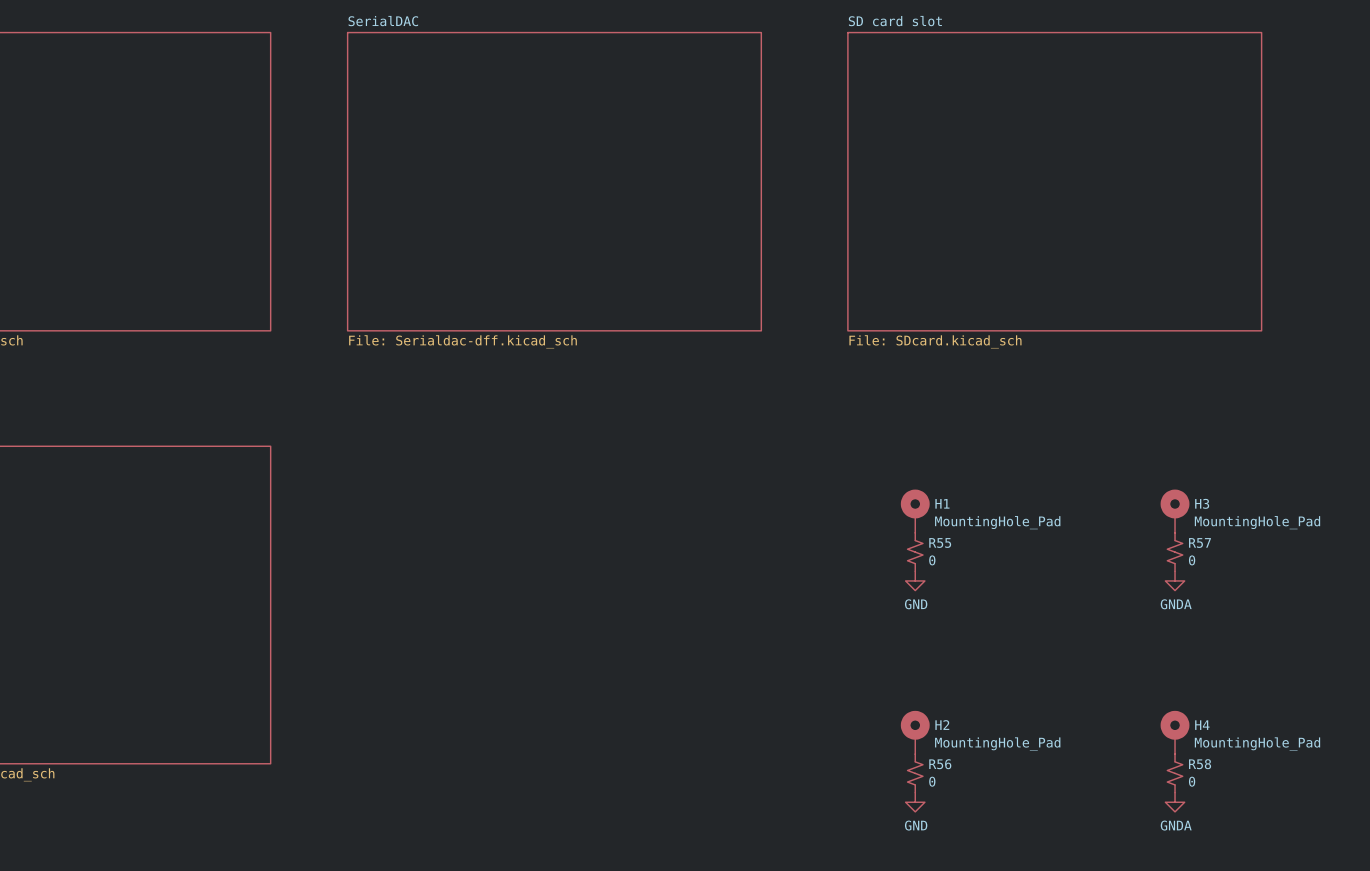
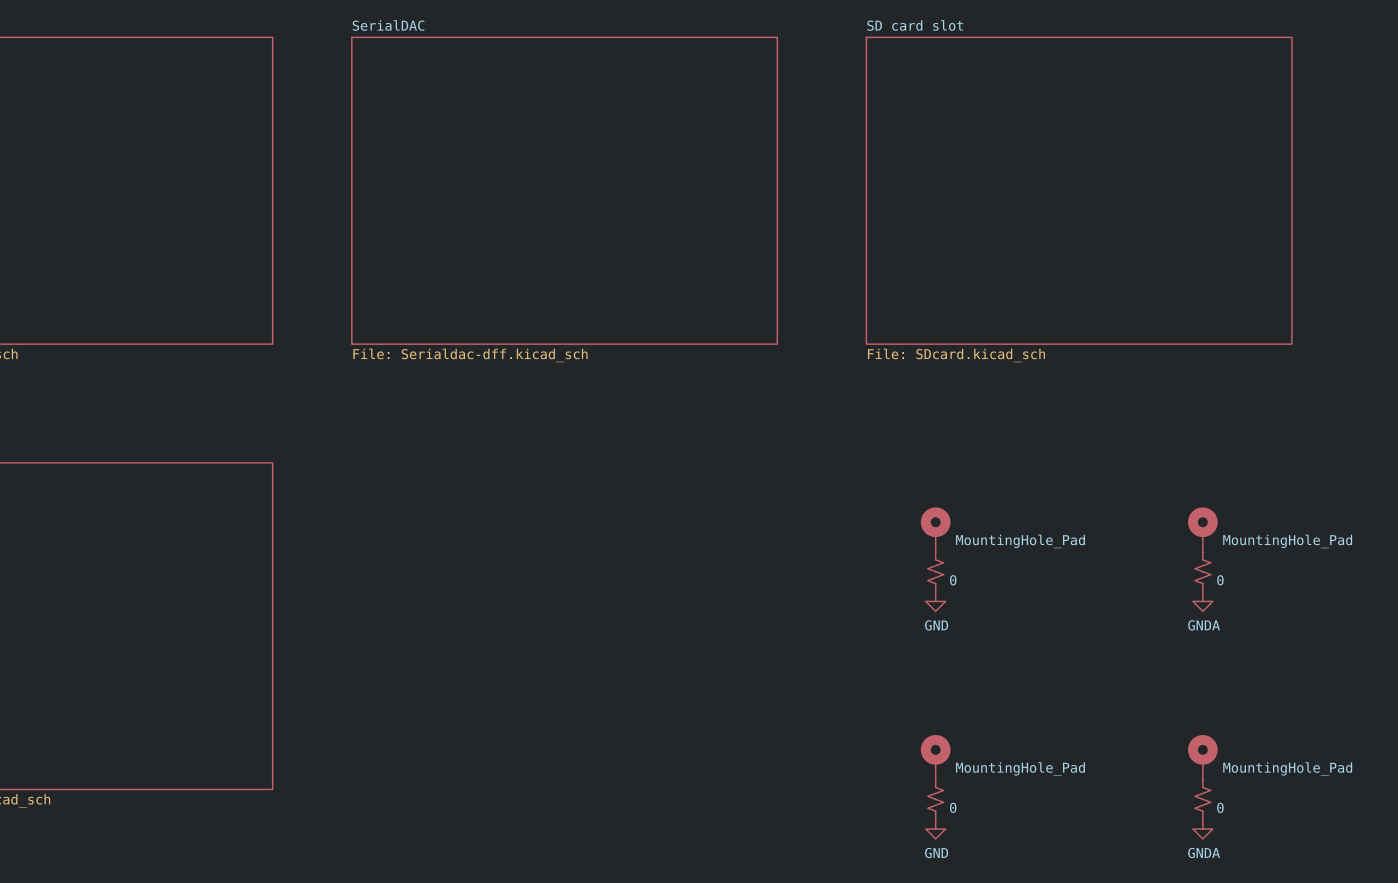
H1 name: H1 (942, 503) -> none
H3 name: H3 (1202, 503) -> none
R55 name: R55 (940, 542) -> none
R57 name: R57 (1199, 542) -> none
H2 name: H2 (942, 725) -> none
H4 name: H4 (1202, 725) -> none
R56 name: R56 (940, 764) -> none
R58 name: R58 (1200, 764) -> none

